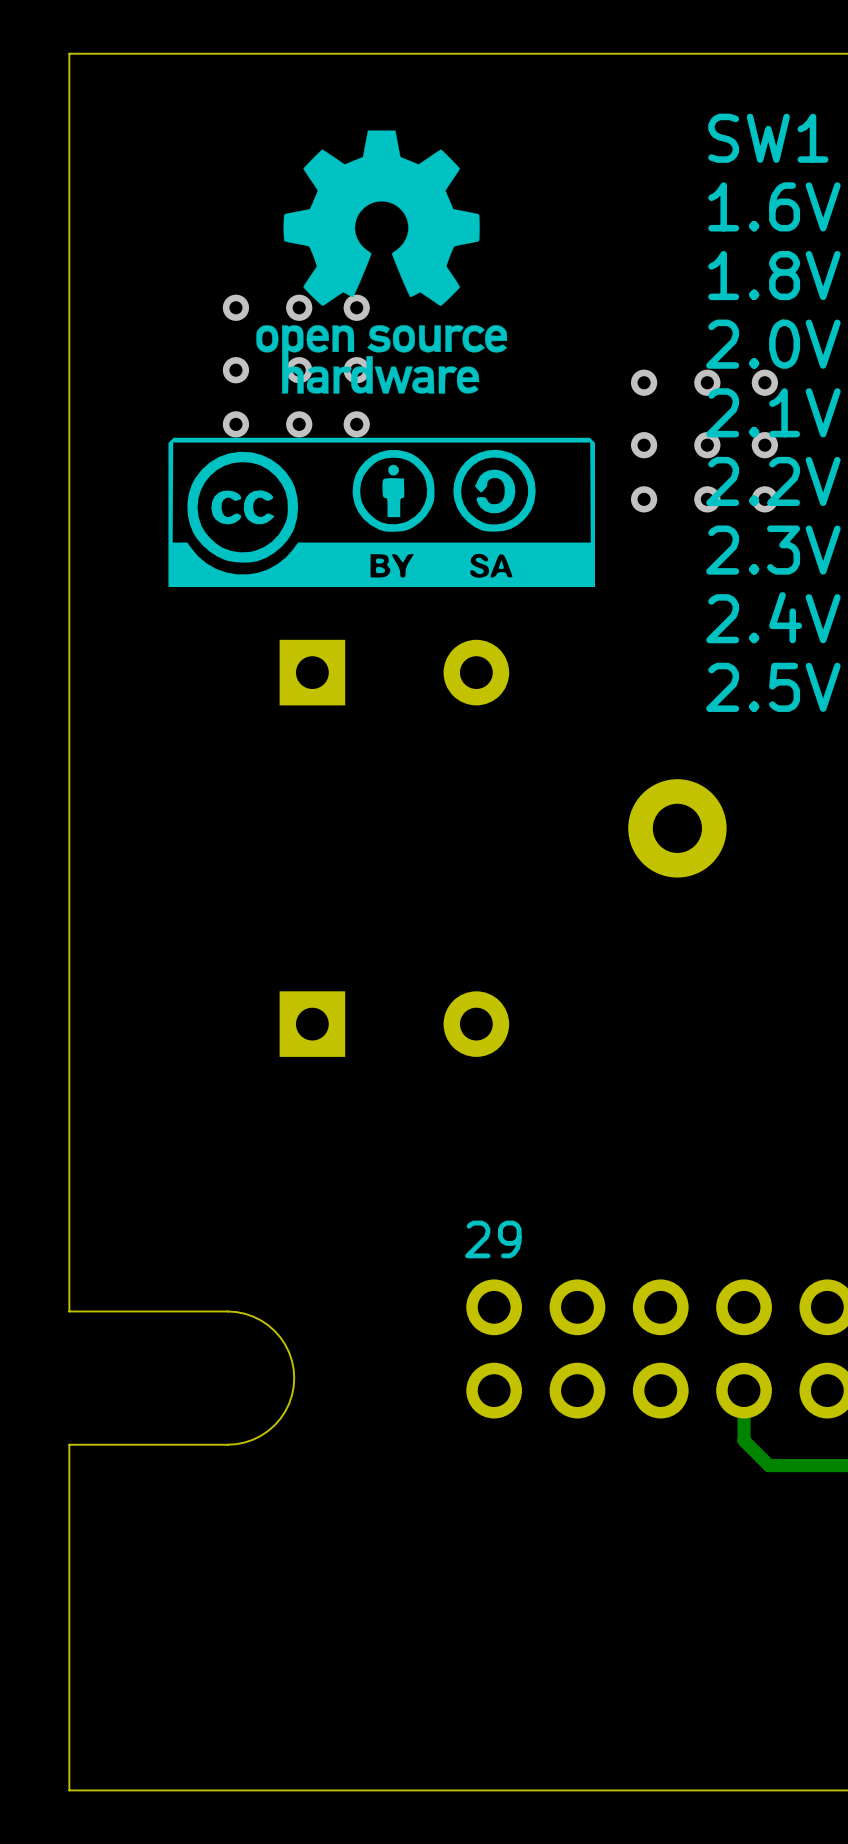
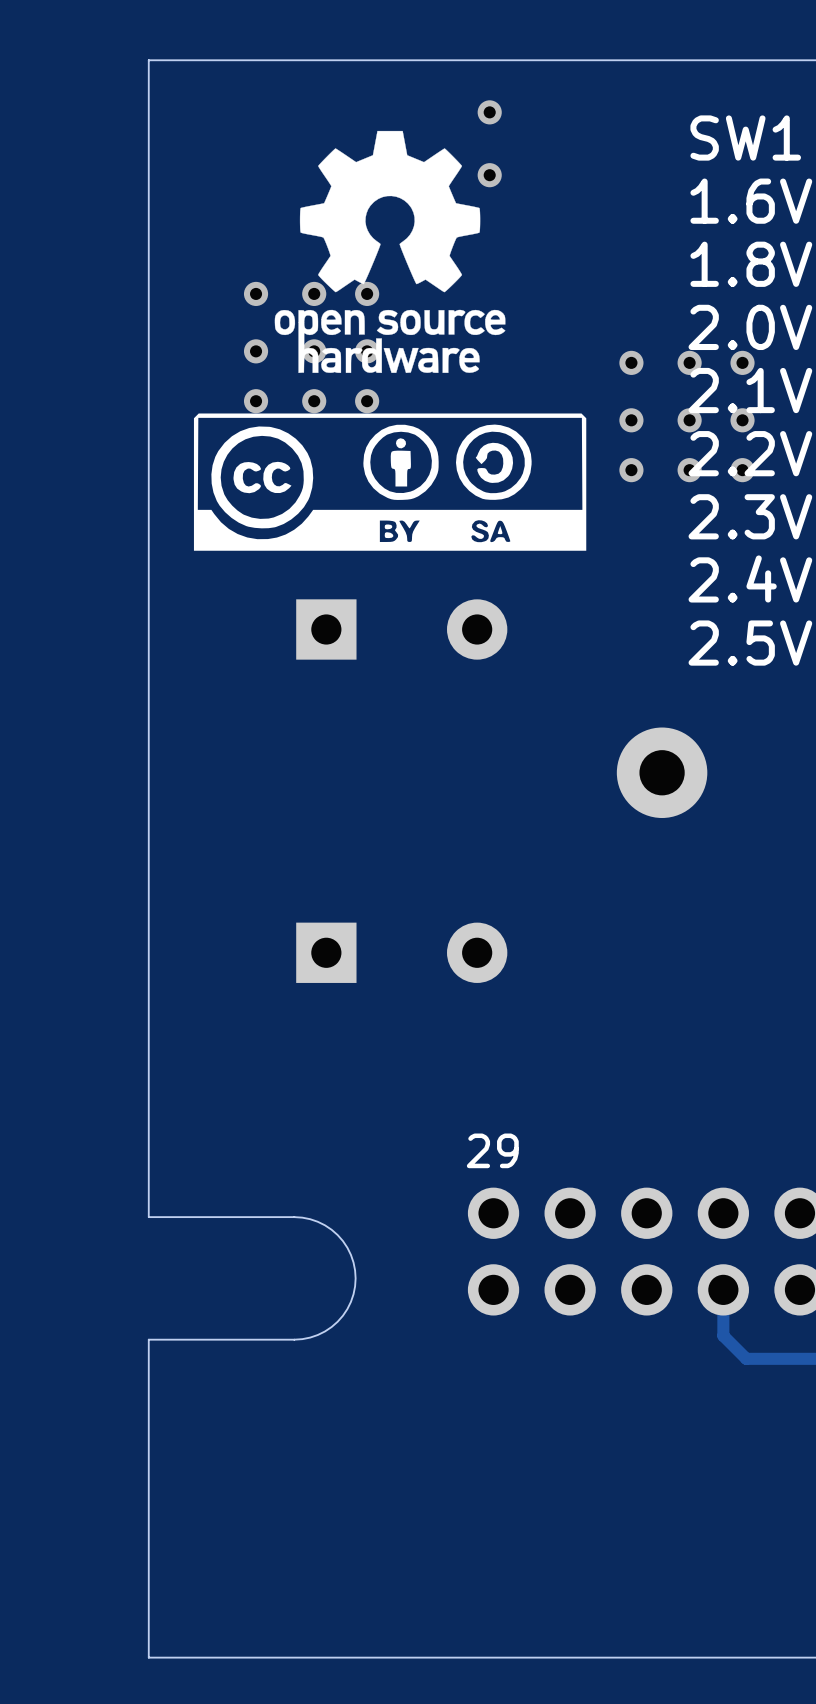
board edge: (119, 53) (69, 53) (69, 1311) (119, 1311) -> (148, 60) (148, 1217)
via: none -> (489, 112)
via: none -> (489, 175)
board edge: (227, 1311) (253, 1316) (274, 1330) (289, 1352) (294, 1378) (289, 1403) (274, 1425) (253, 1439) (227, 1444) -> (248, 1217) (302, 1217) (324, 1225) (337, 1235) (347, 1247) (353, 1262) (355, 1278) (353, 1294) (347, 1309) (337, 1321) (324, 1331) (302, 1339) (248, 1339)
board edge: (119, 1444) (69, 1444) (69, 1790) (119, 1790) -> (148, 1339) (148, 1657)

